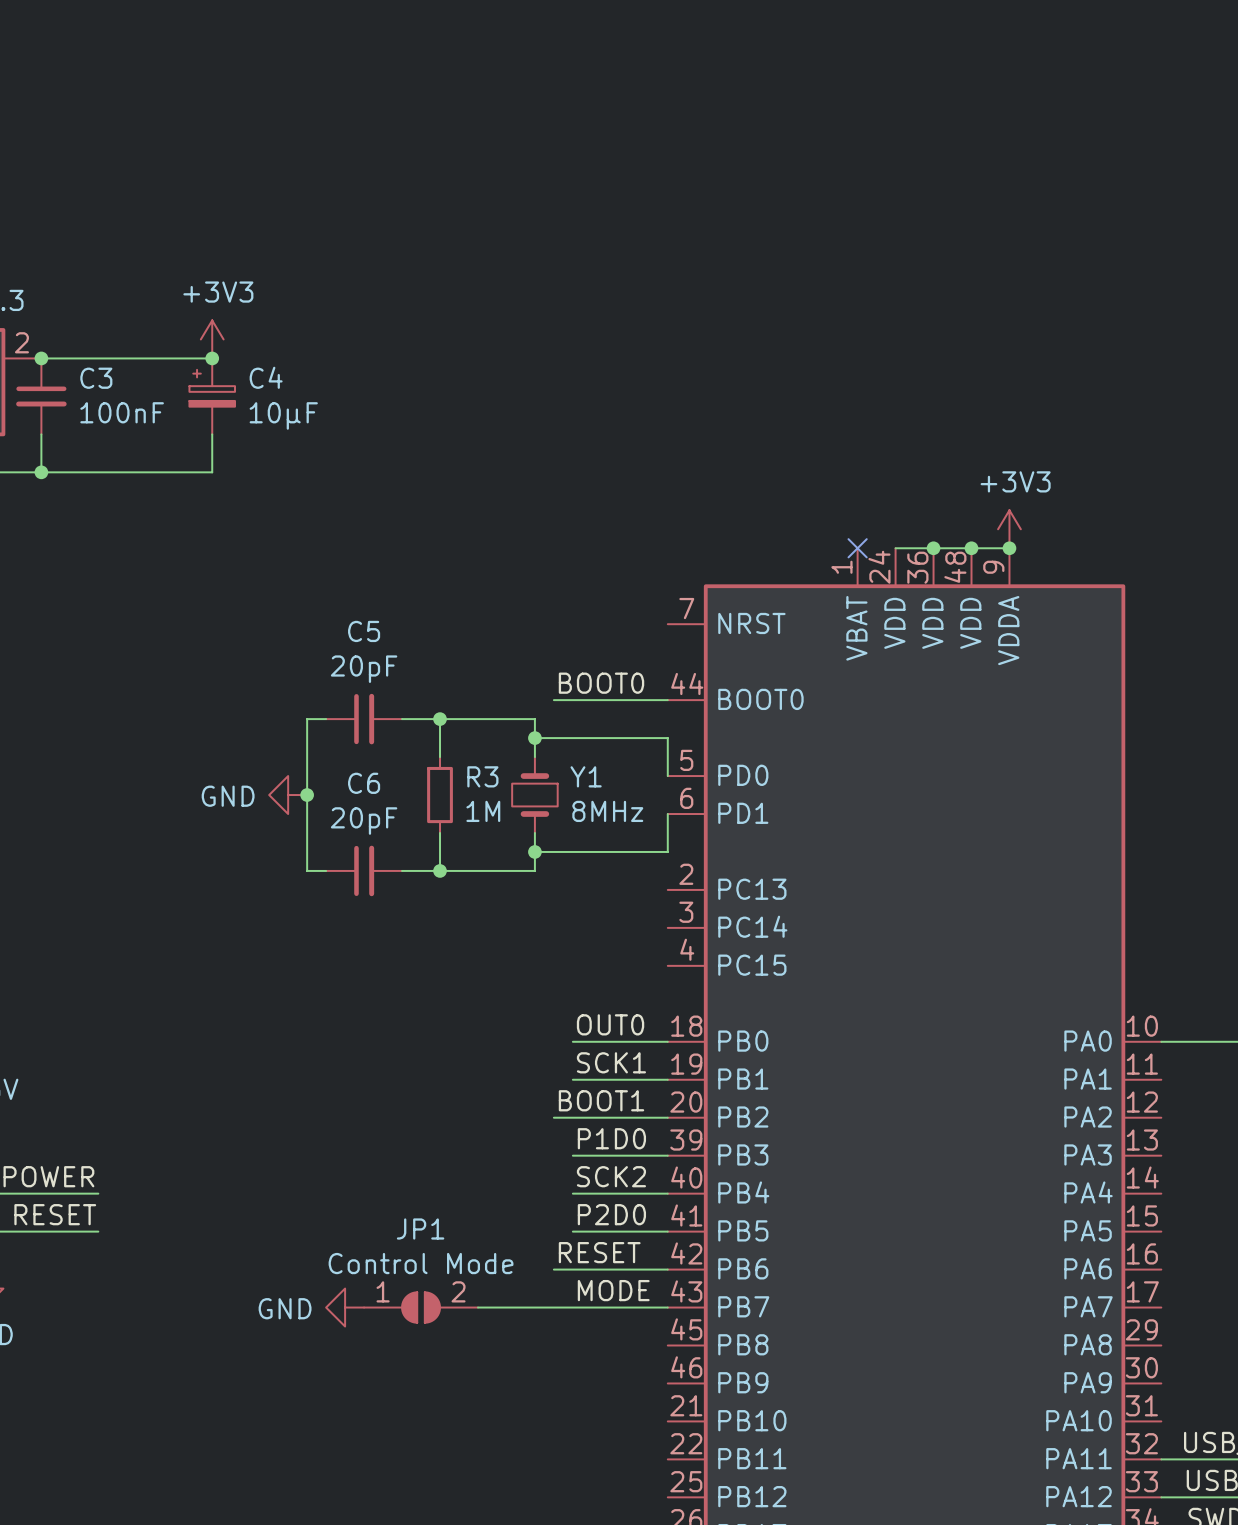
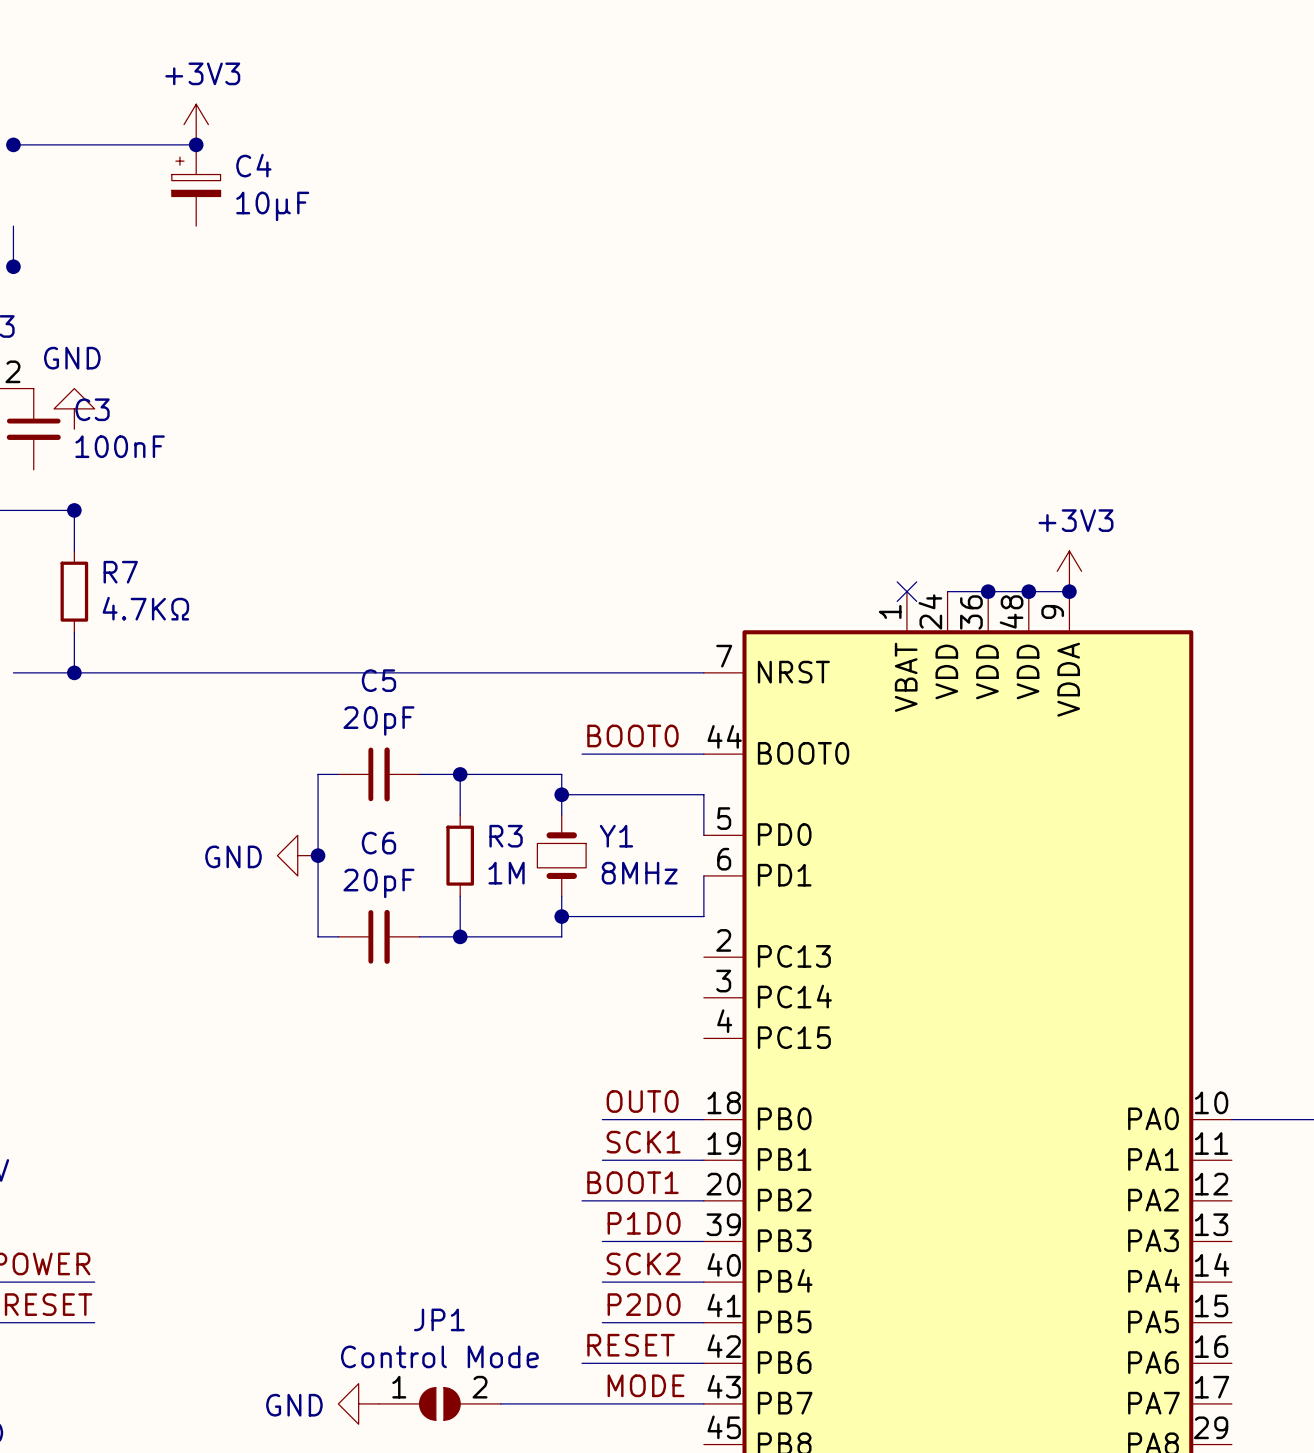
junction: none -> (13, 144)
junction: none -> (196, 144)
junction: none -> (13, 266)
power symbol position: +3V3 (212, 339) -> +3V3 (196, 124)
wire: (41, 358) (212, 358) -> (13, 144) (196, 144)
junction: (41, 358) -> none
junction: (212, 358) -> none
power symbol: none -> GND (74, 408)
C4 position: (212, 396) -> (196, 185)
wire: (41, 434) (41, 472) -> (13, 226) (13, 266)
wire: (212, 434) (212, 472) (79, 472) -> (74, 551) (74, 510)
junction position: (41, 472) -> (74, 510)
R7: none -> 4.7KΩ (74, 591)
wire: none -> (74, 632) (74, 672)
wire: none -> (13, 672) (703, 672)
junction: none -> (74, 672)

